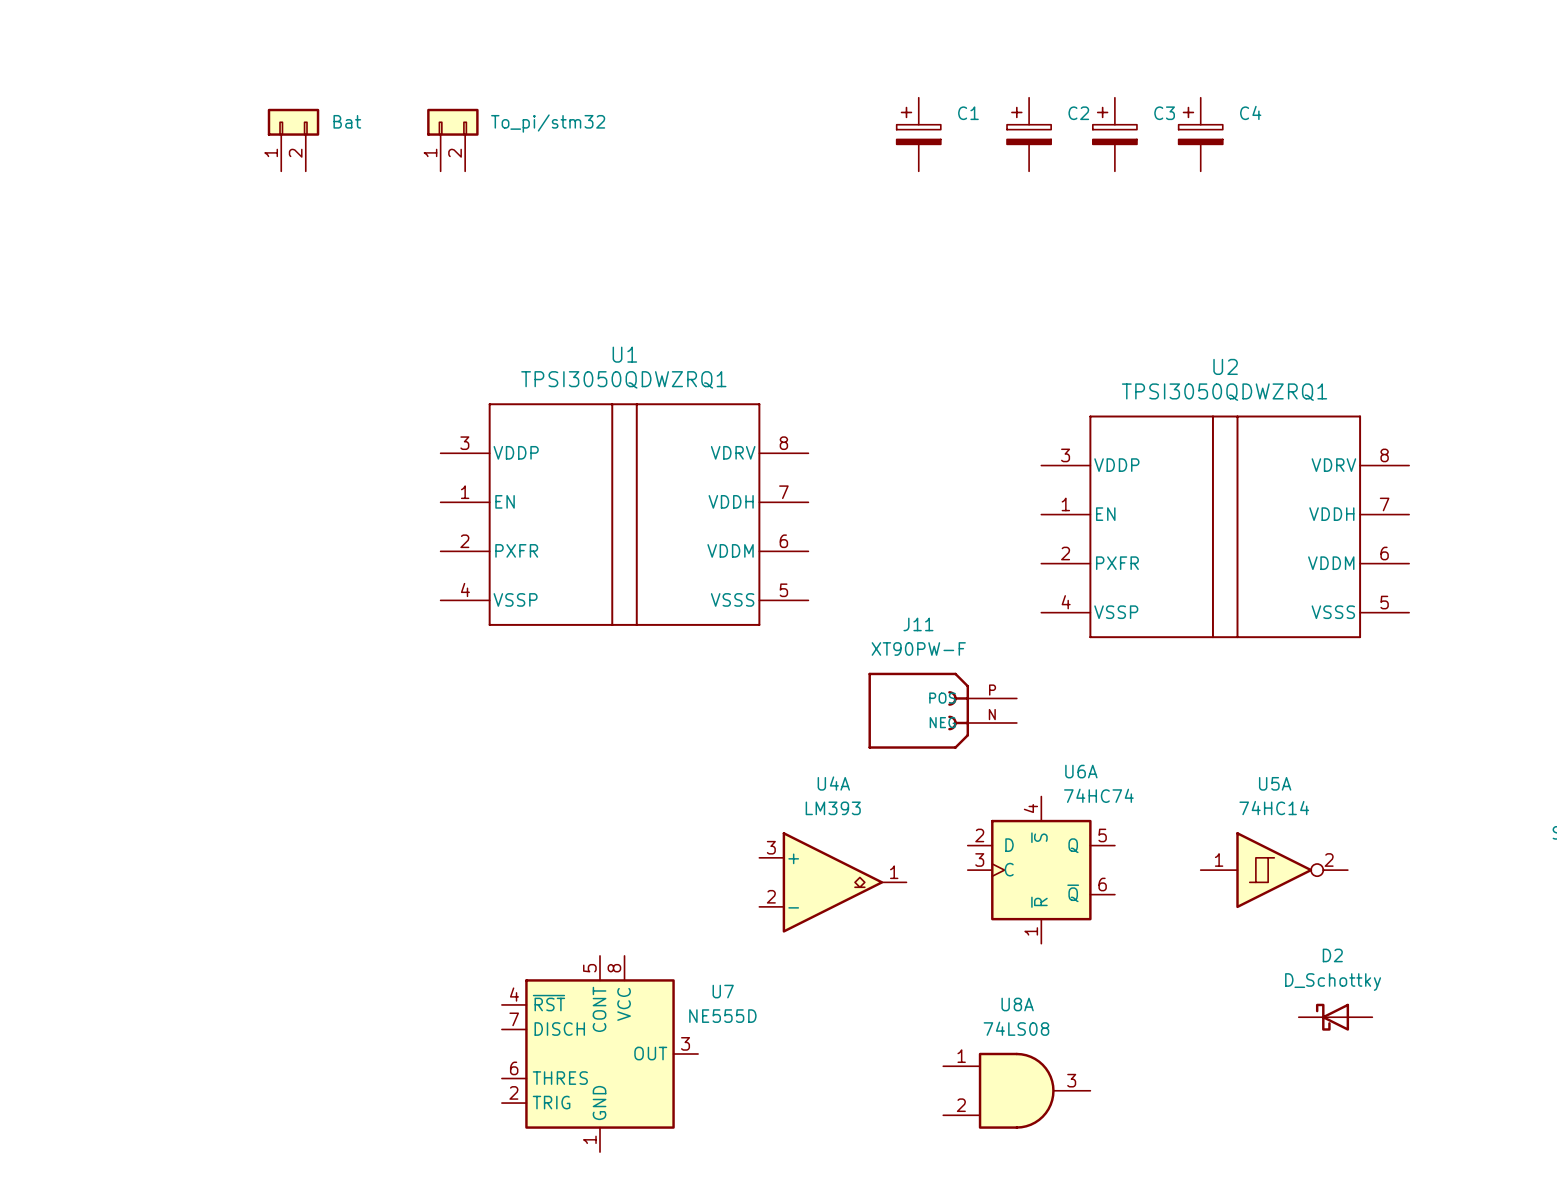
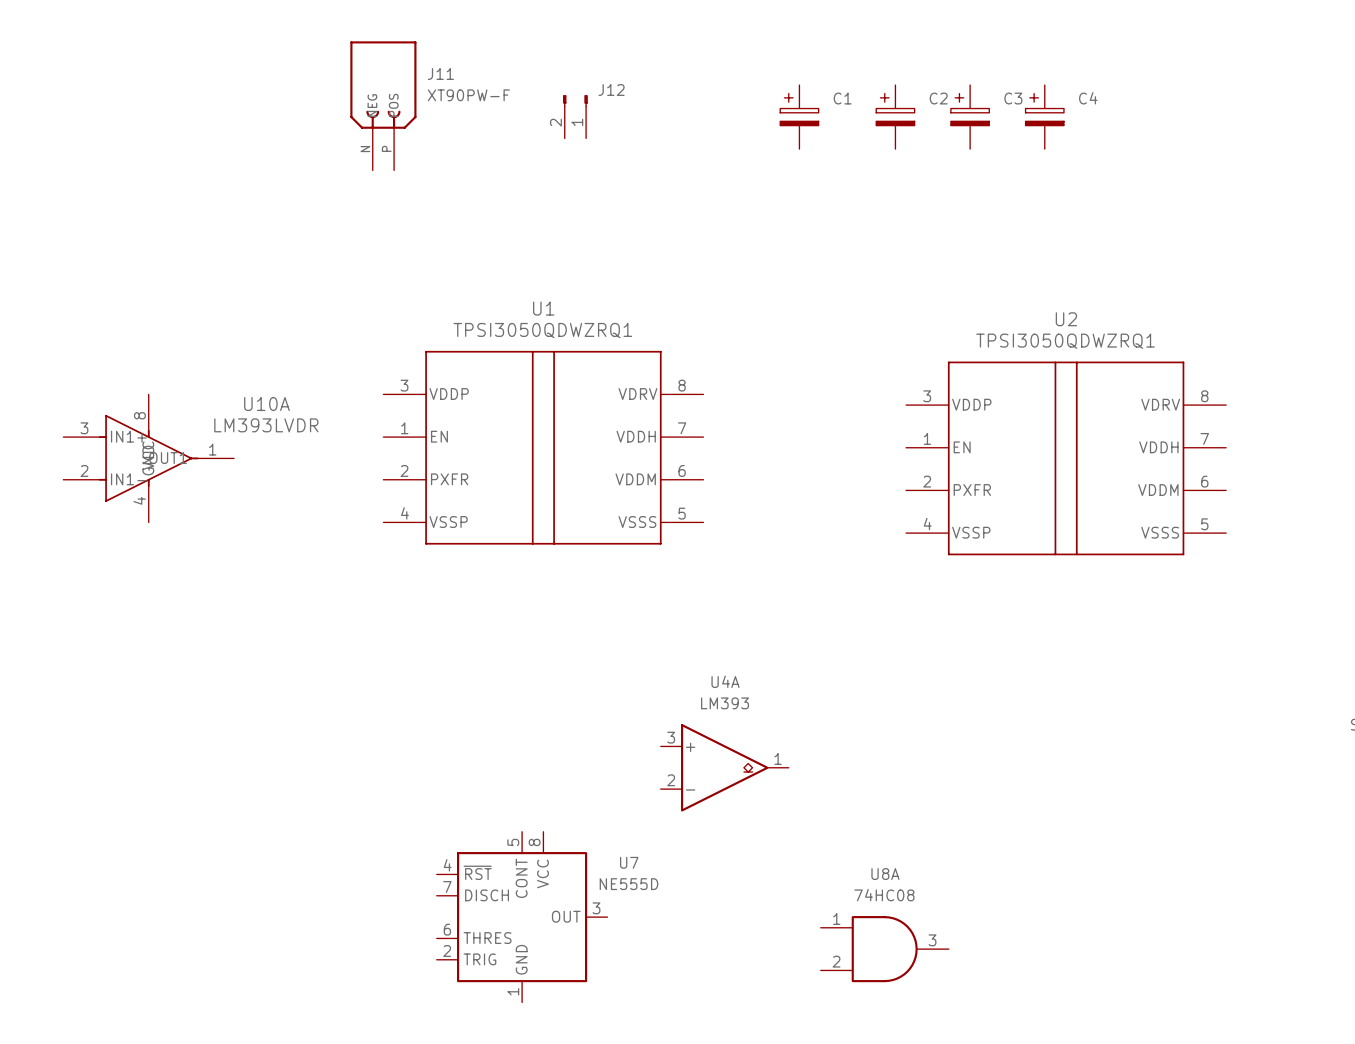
J12: none -> (575, 116)
Bat: (293, 140) -> none
To_pi/stm32: (452, 140) -> none
U10A: none -> LM393LVDR (148, 458)
J11 name position: J11 (918, 624) -> J11 (440, 73)
J11 value position: XT90PW-F (918, 648) -> XT90PW-F (468, 95)
J11 rotation: 0° (918, 710) -> 90° clockwise (383, 85)
J11 position: (942, 710) -> (383, 105)
U6A: 74HC74 (1041, 870) -> none
U5A: 74HC14 (1274, 870) -> none
D2: D_Schottky (1335, 1017) -> none
U8A value: 74LS08 (1016, 1028) -> 74HC08 (884, 895)

